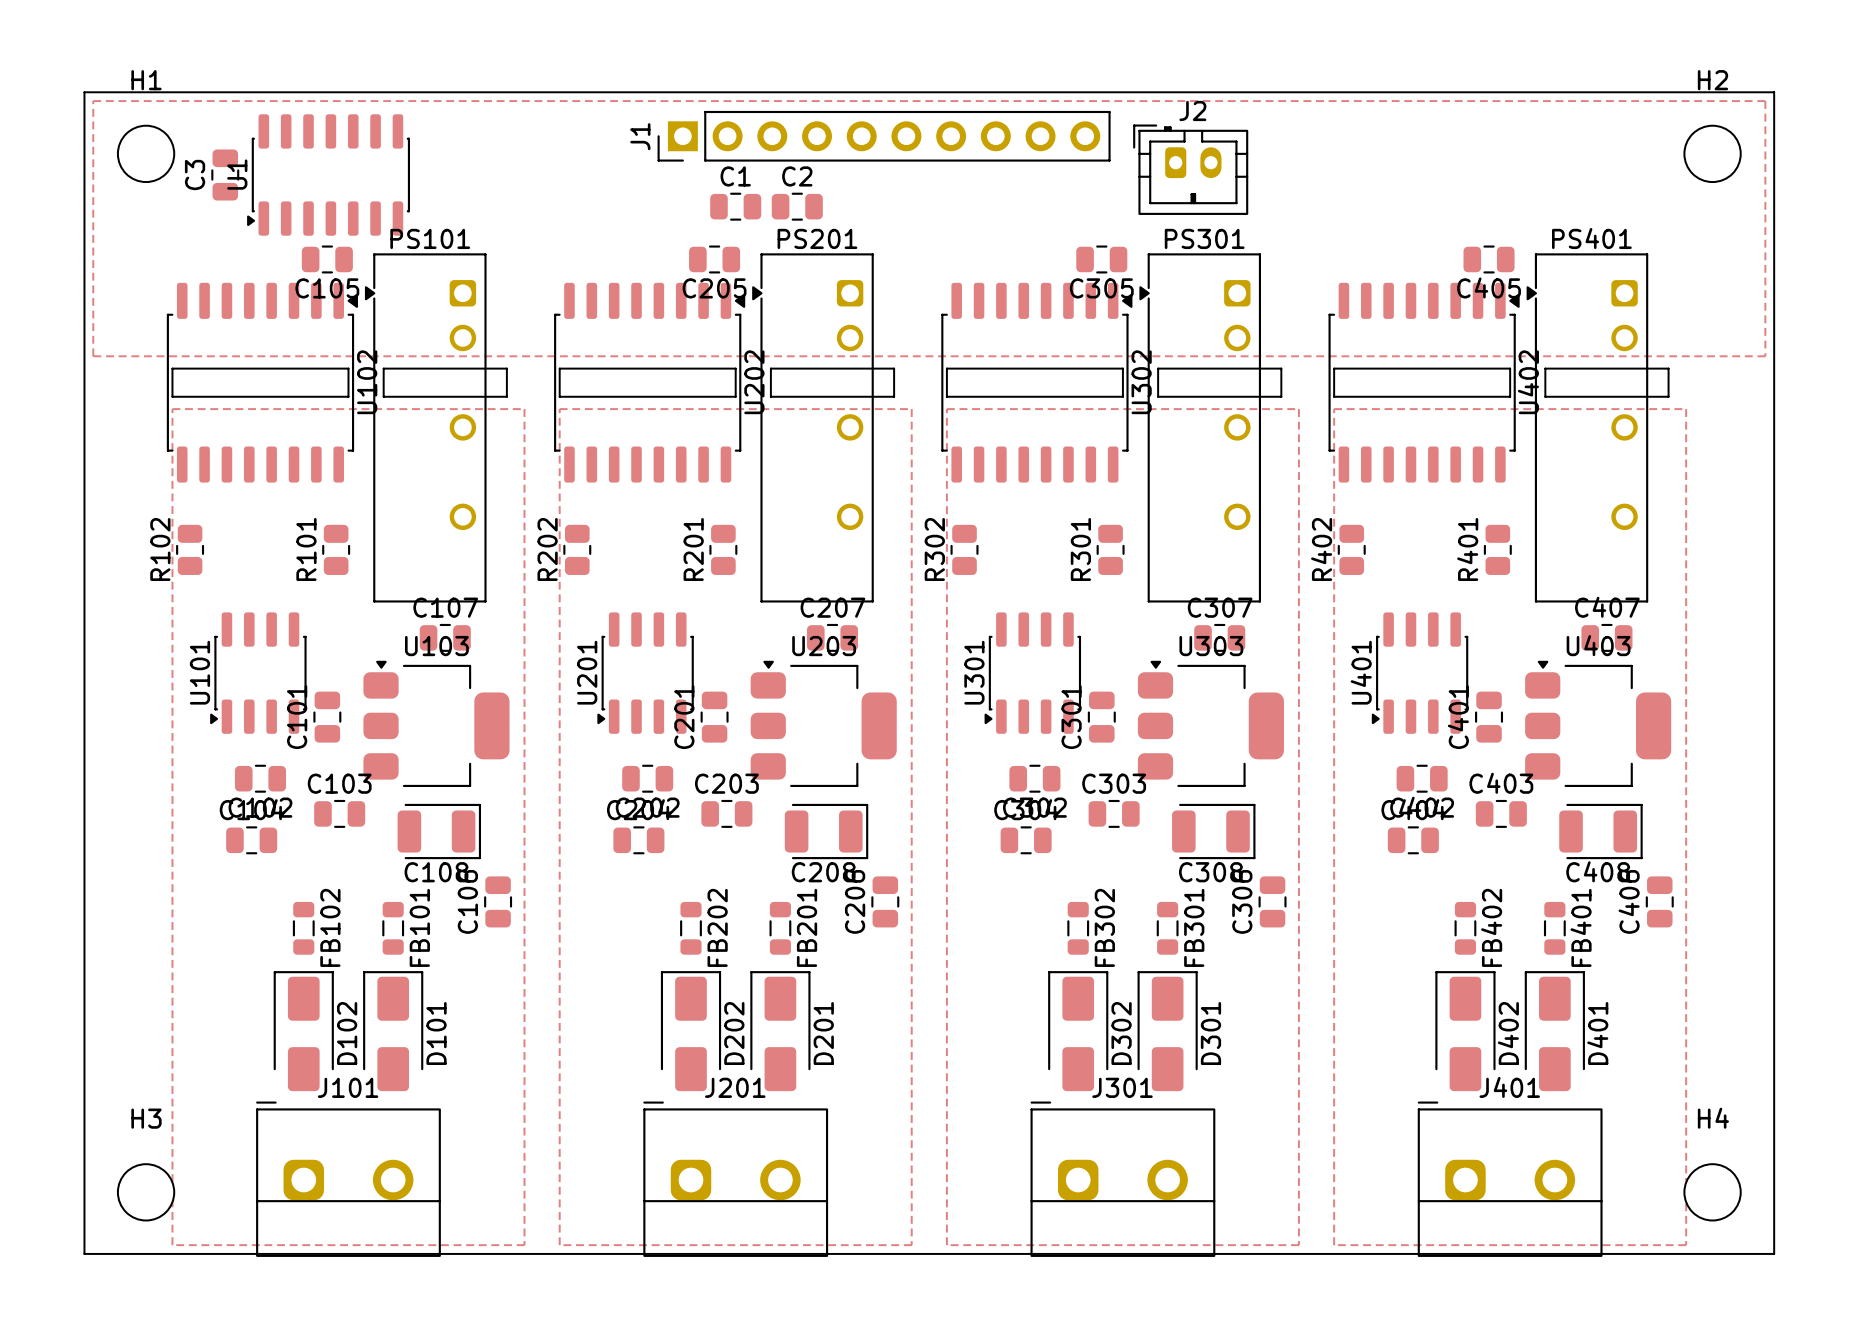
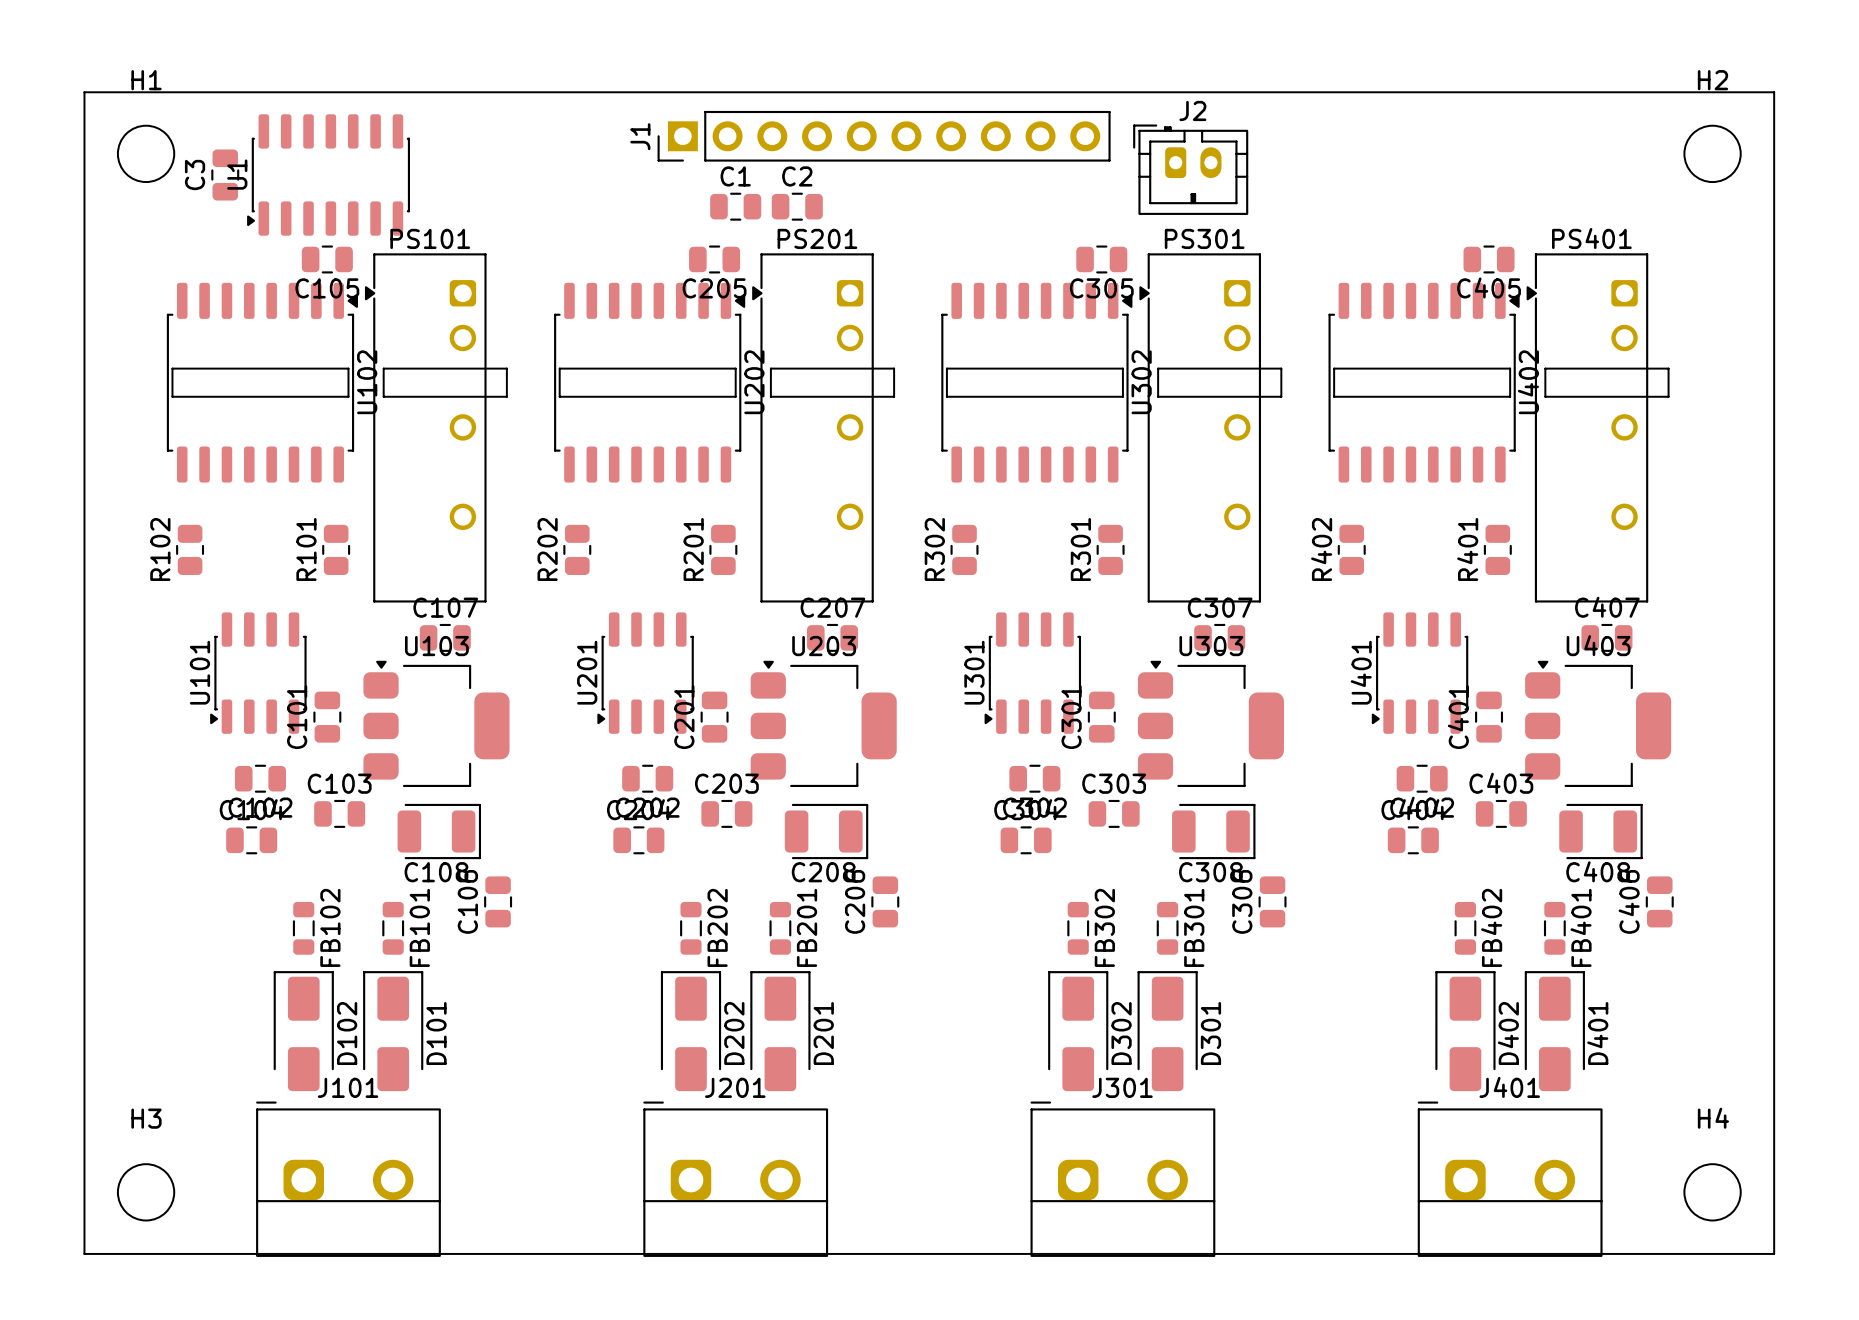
zone outline: (93, 101) (1765, 101) (1765, 356) (93, 356) (93, 101) -> none
zone outline: (172, 409) (524, 409) (524, 1245) (172, 1245) (172, 409) -> none
zone outline: (559, 409) (911, 409) (911, 1245) (559, 1245) (559, 409) -> none
zone outline: (946, 409) (1298, 409) (1298, 1245) (946, 1245) (946, 409) -> none
zone outline: (1334, 409) (1686, 409) (1686, 1245) (1334, 1245) (1334, 409) -> none

